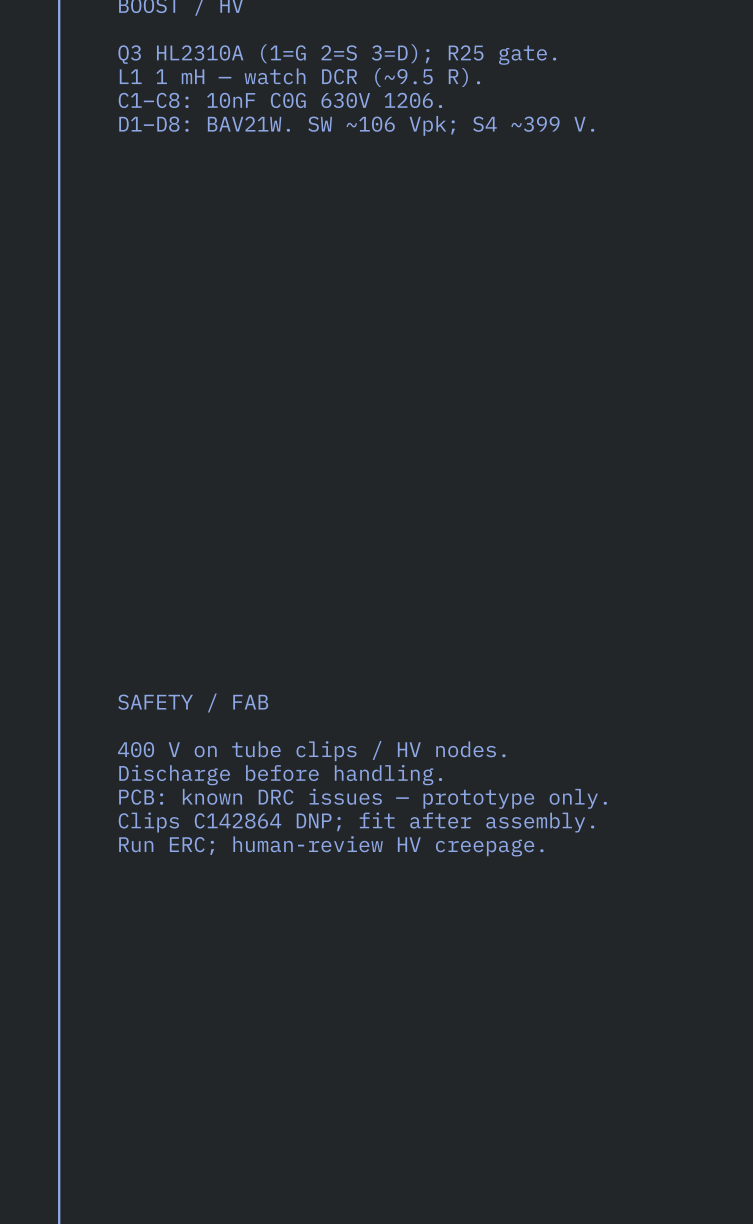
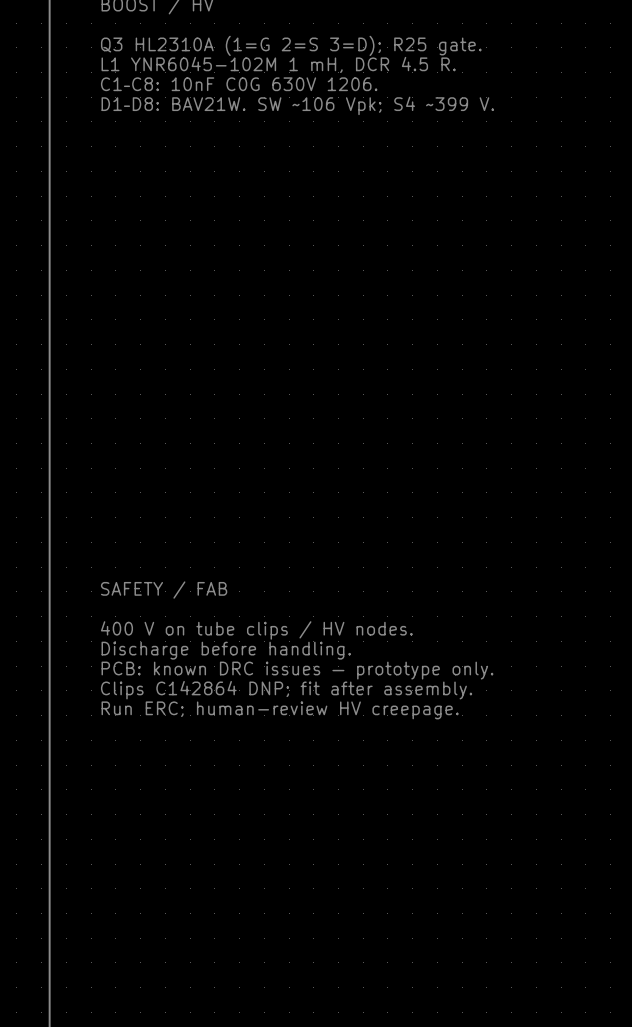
text: L1 1 mH — watch DCR (~9.5 R). (299, 77) -> L1 YNR6045-102M 1 mH, DCR 4.5 R. (278, 64)

